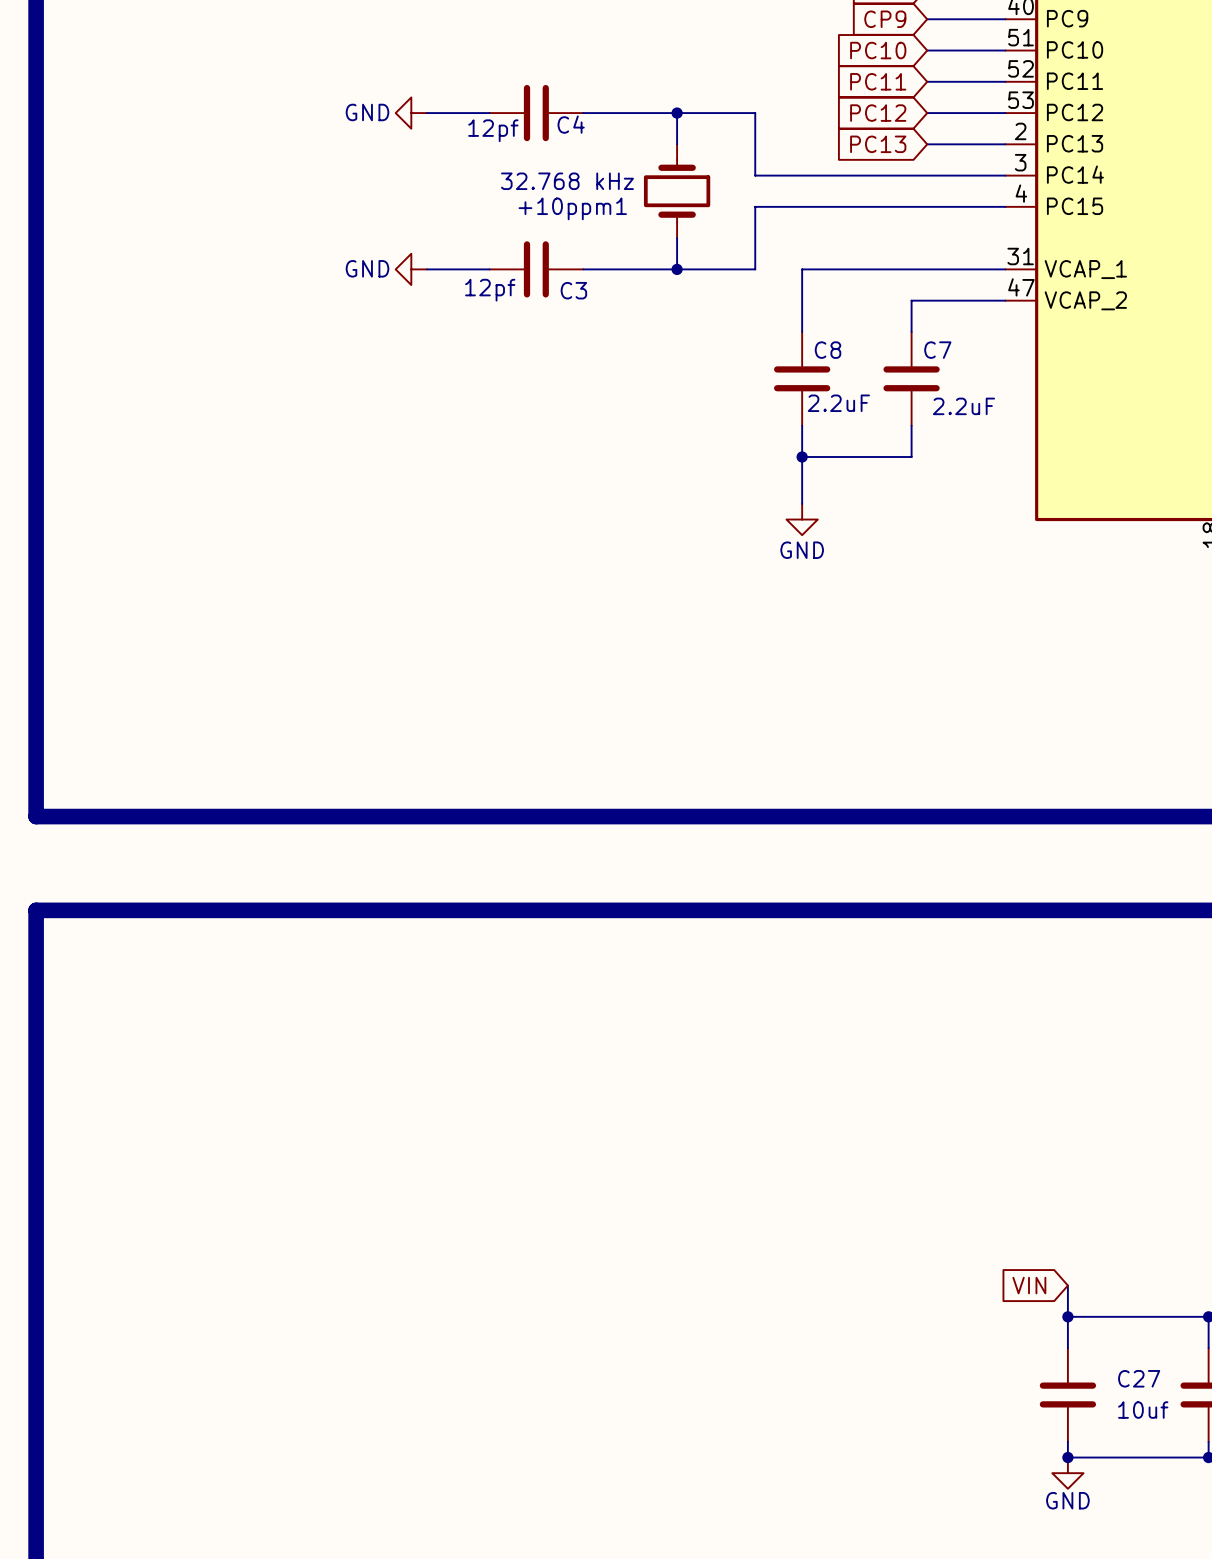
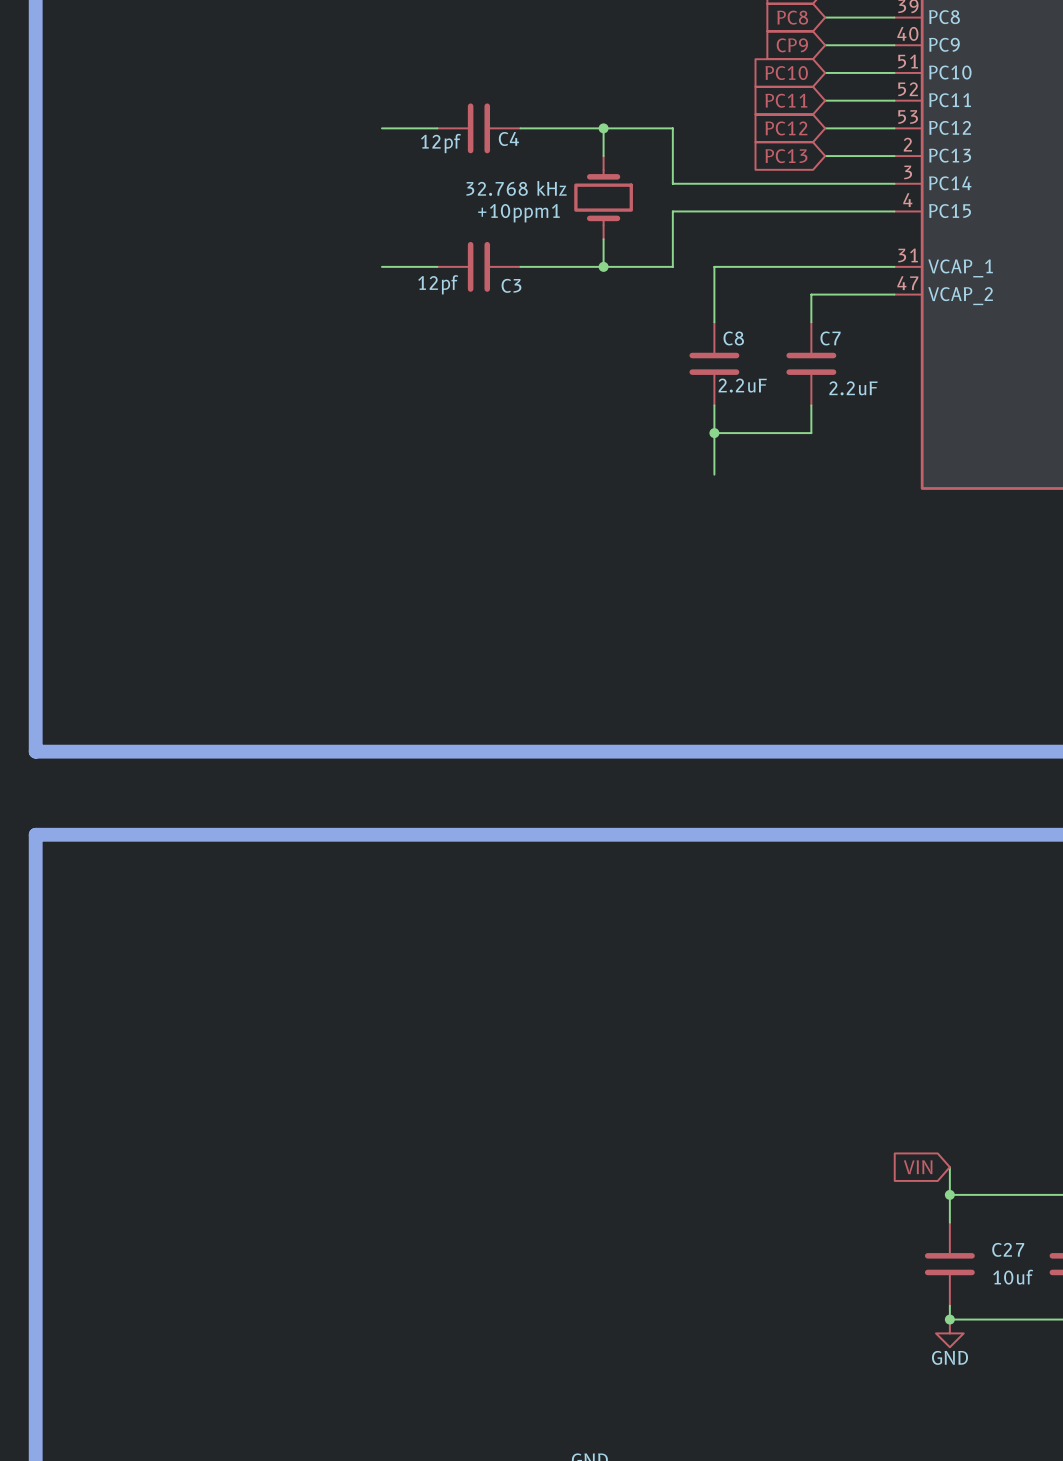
power symbol: GND (411, 113) -> none
power symbol: GND (411, 269) -> none
power symbol: GND (802, 519) -> none

